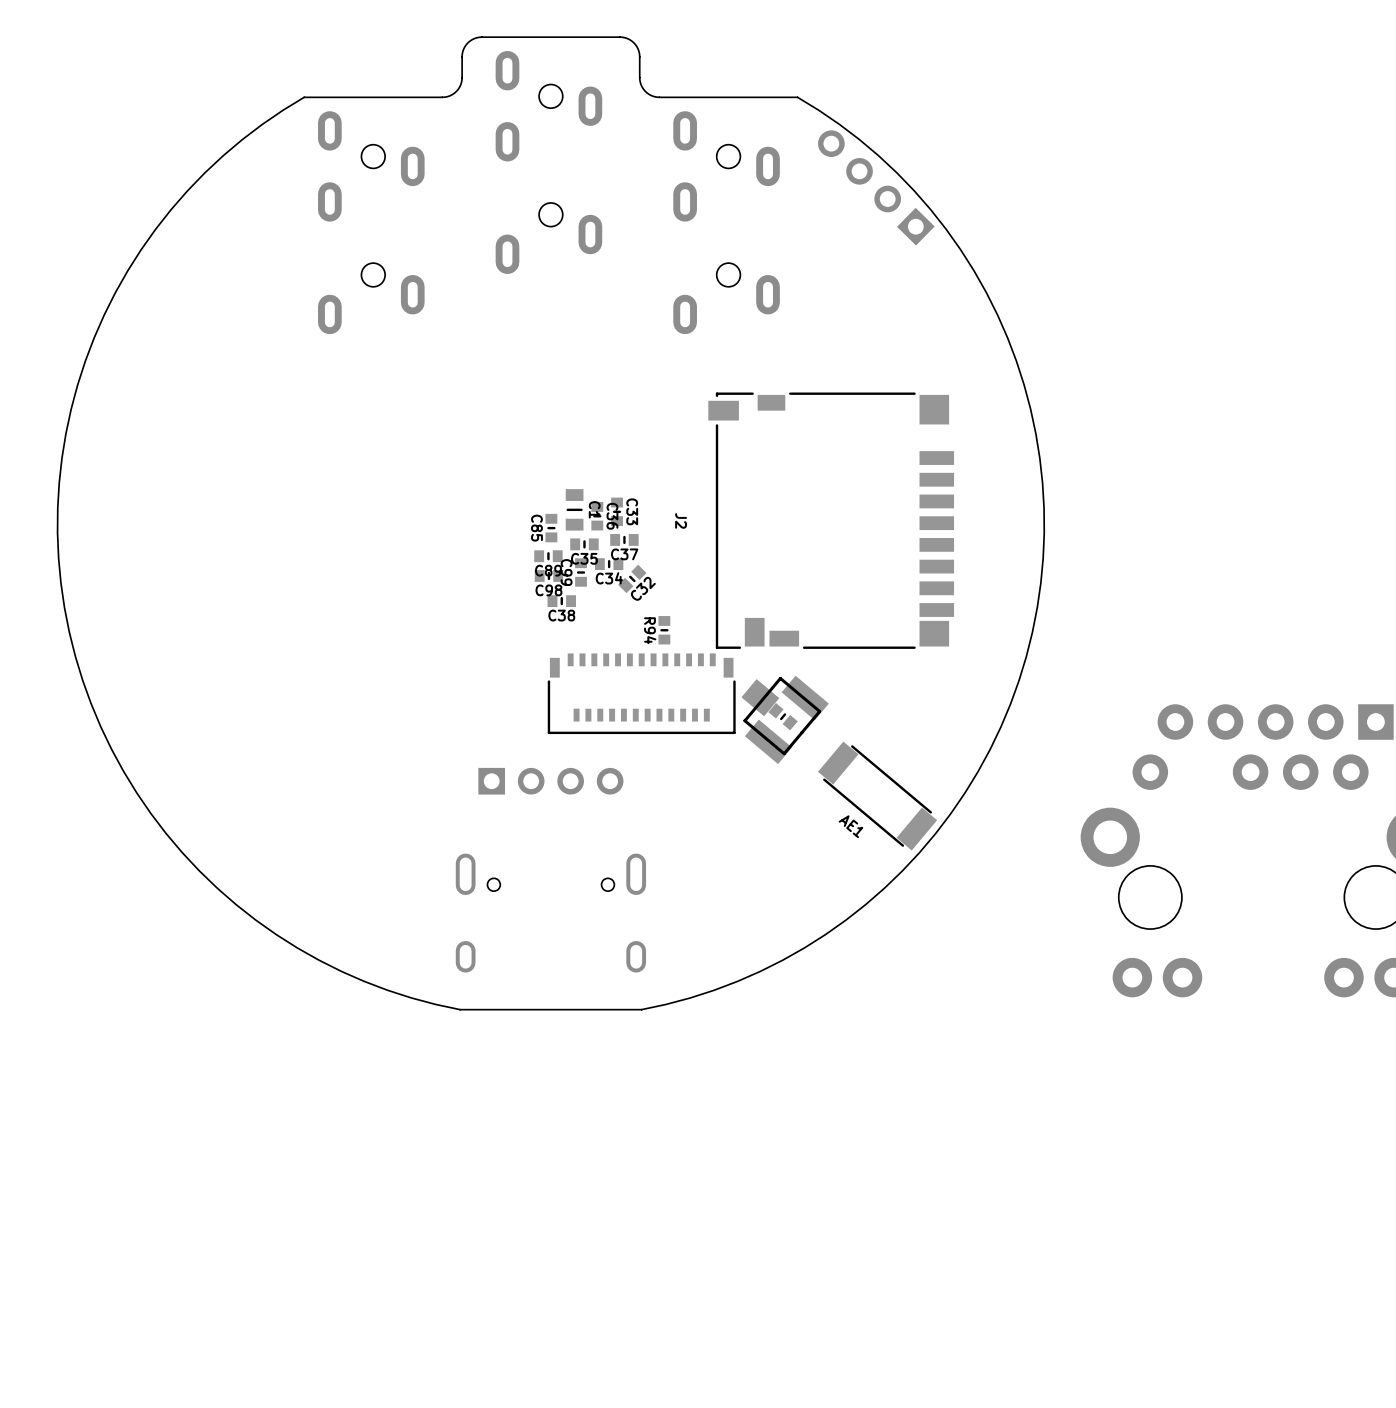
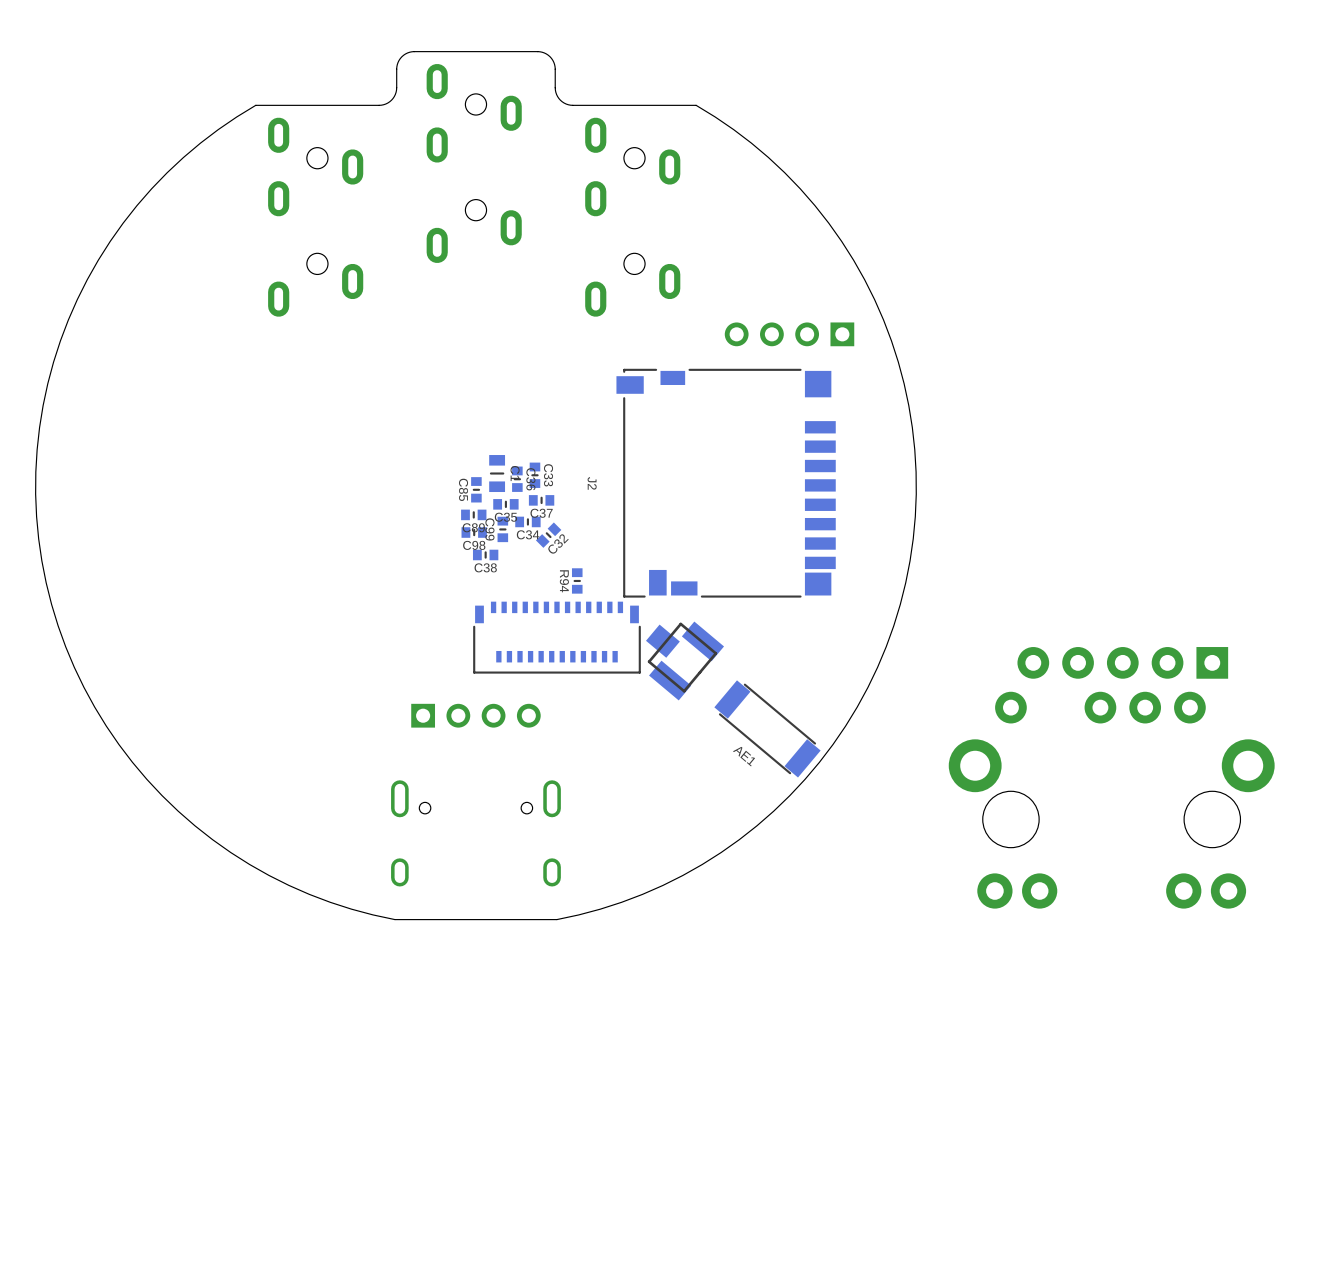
part: (876, 187) -> none
part: none -> (789, 334)
AE1 footprint: [741, 675, 938, 851] -> [646, 621, 821, 778]

